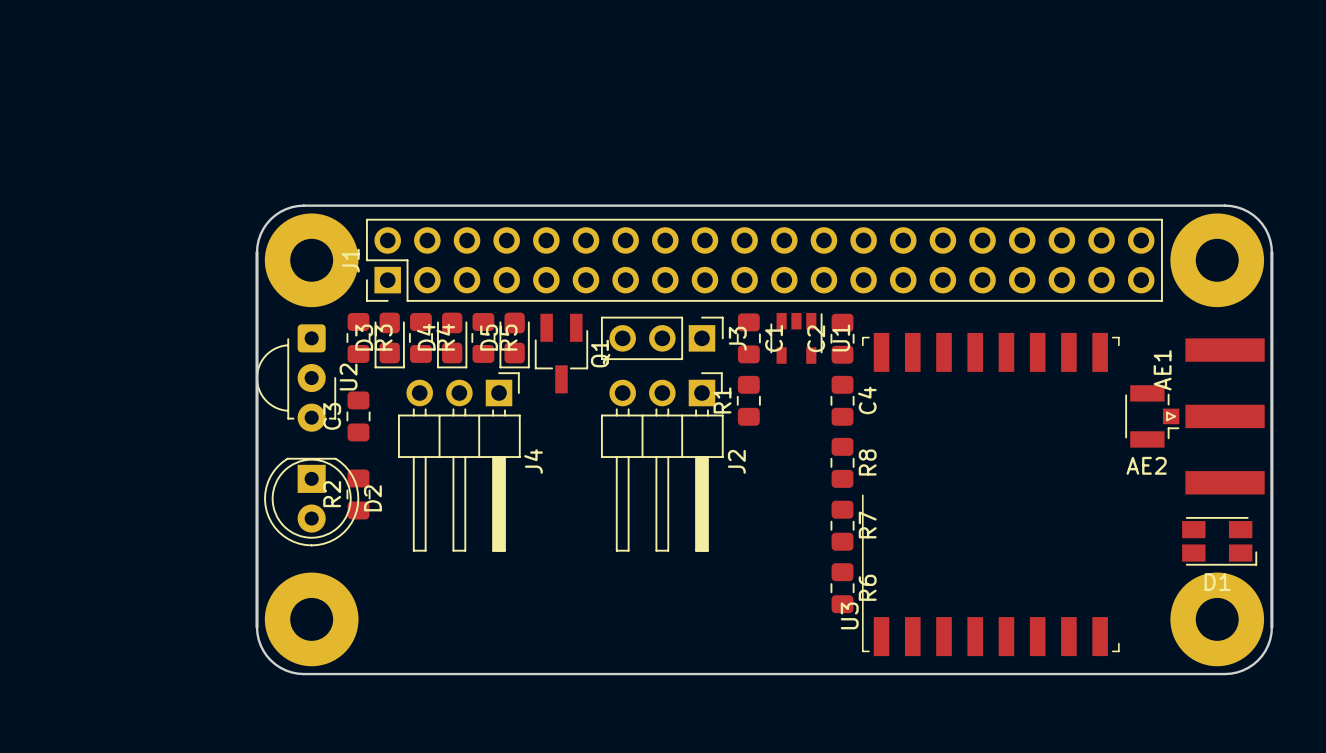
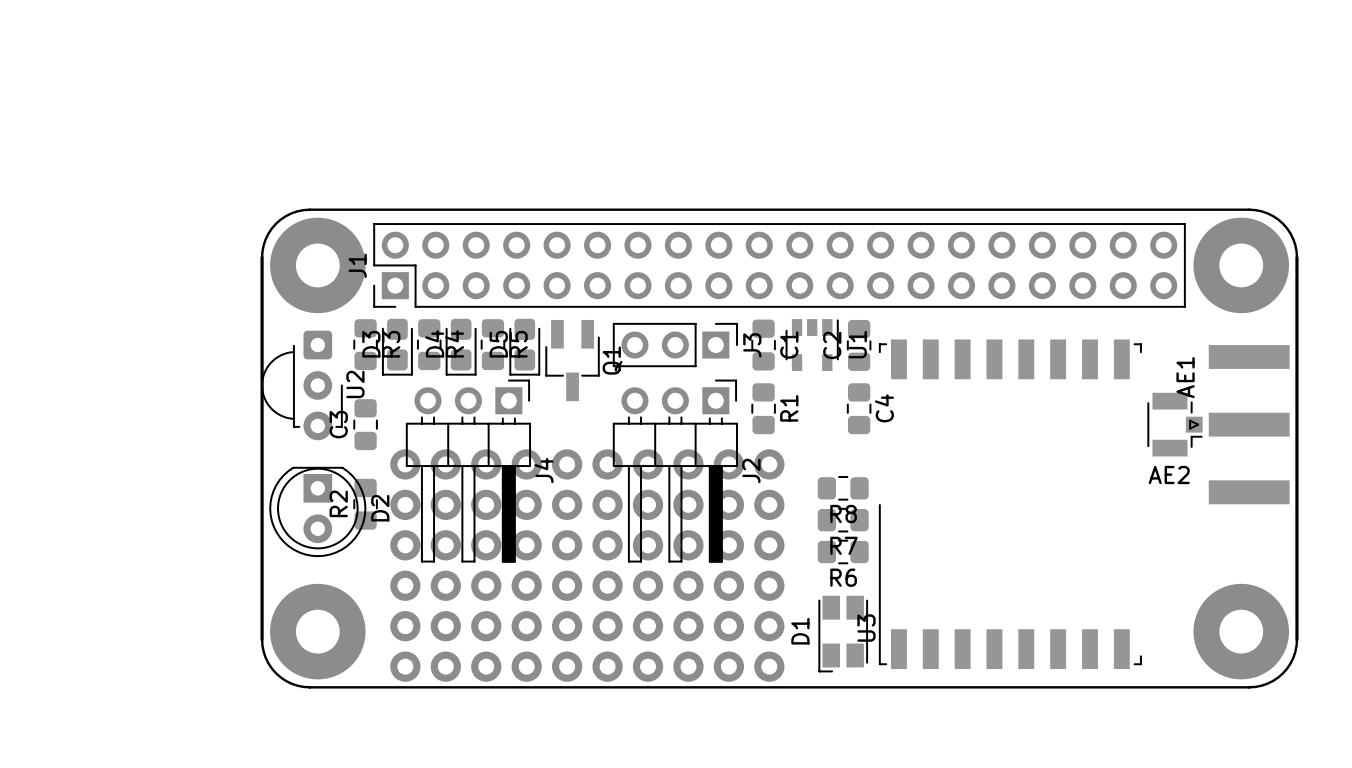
R1 name position: R1 (722, 400) -> R1 (789, 408)
R8 rotation: 0° (842, 462) -> 90° clockwise (843, 488)
R7 rotation: 0° (842, 525) -> 90° clockwise (843, 520)
D1 rotation: 0° (1219, 541) -> 90° clockwise (843, 634)
D1 position: (1219, 541) -> (843, 634)
part: none -> (587, 565)
R6 rotation: 0° (842, 588) -> 90° clockwise (843, 552)
R6 position: (842, 588) -> (843, 552)

